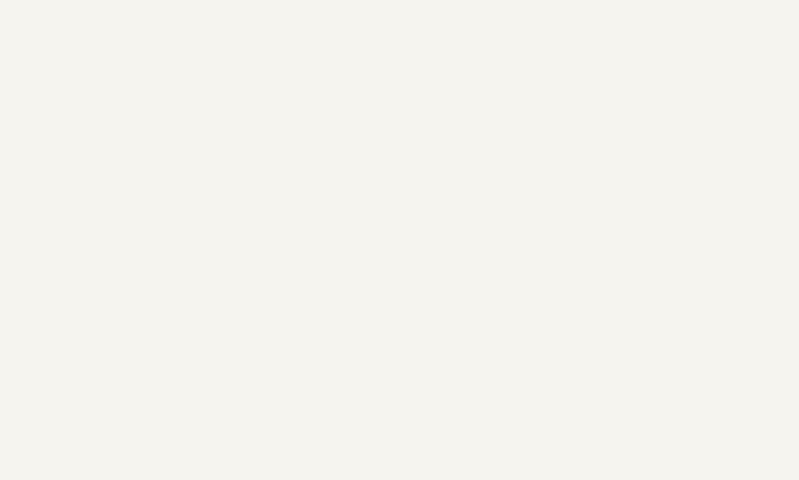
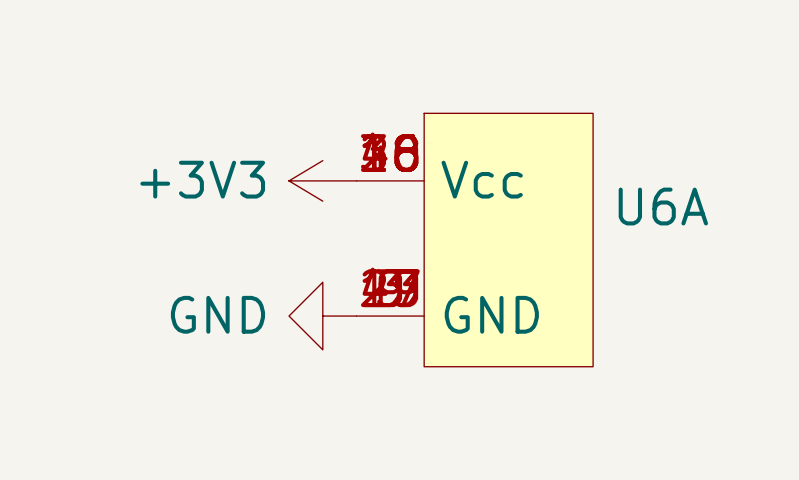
power symbol: none -> +3V3 (322, 180)
U6A: none -> (474, 240)
power symbol: none -> GND (322, 316)

